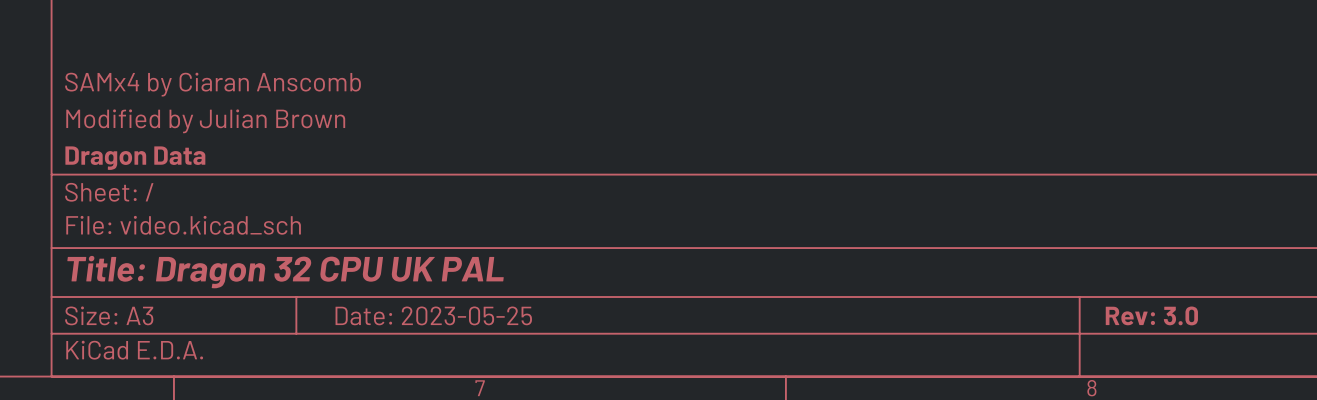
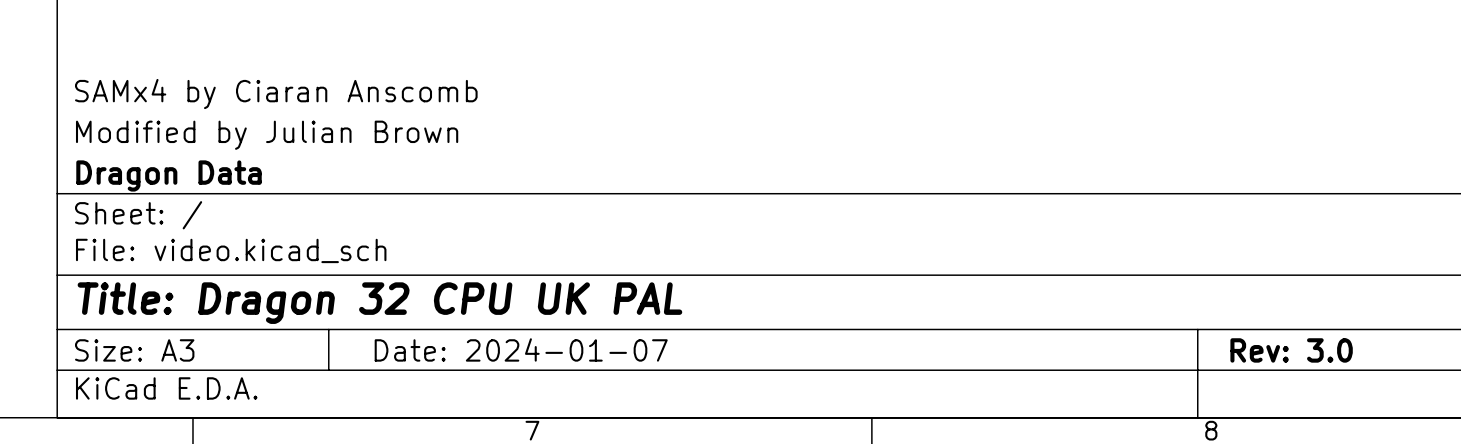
title block: Date: 2023-05-25 (433, 315) -> Date: 2024-01-07 (521, 349)

